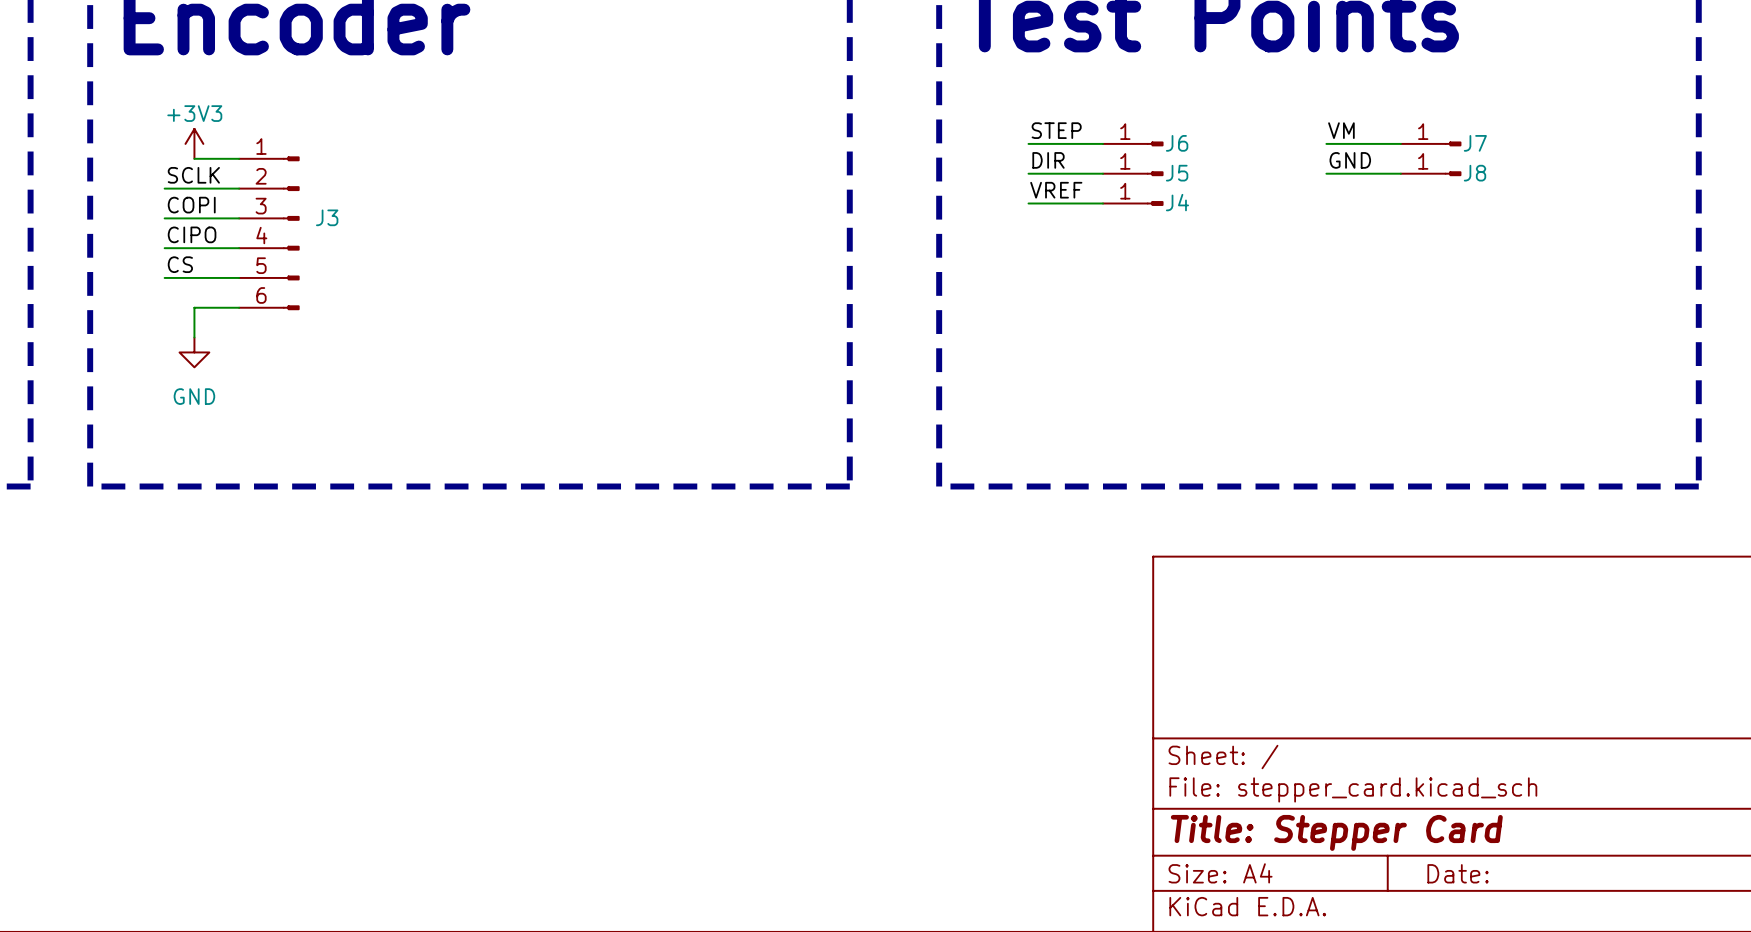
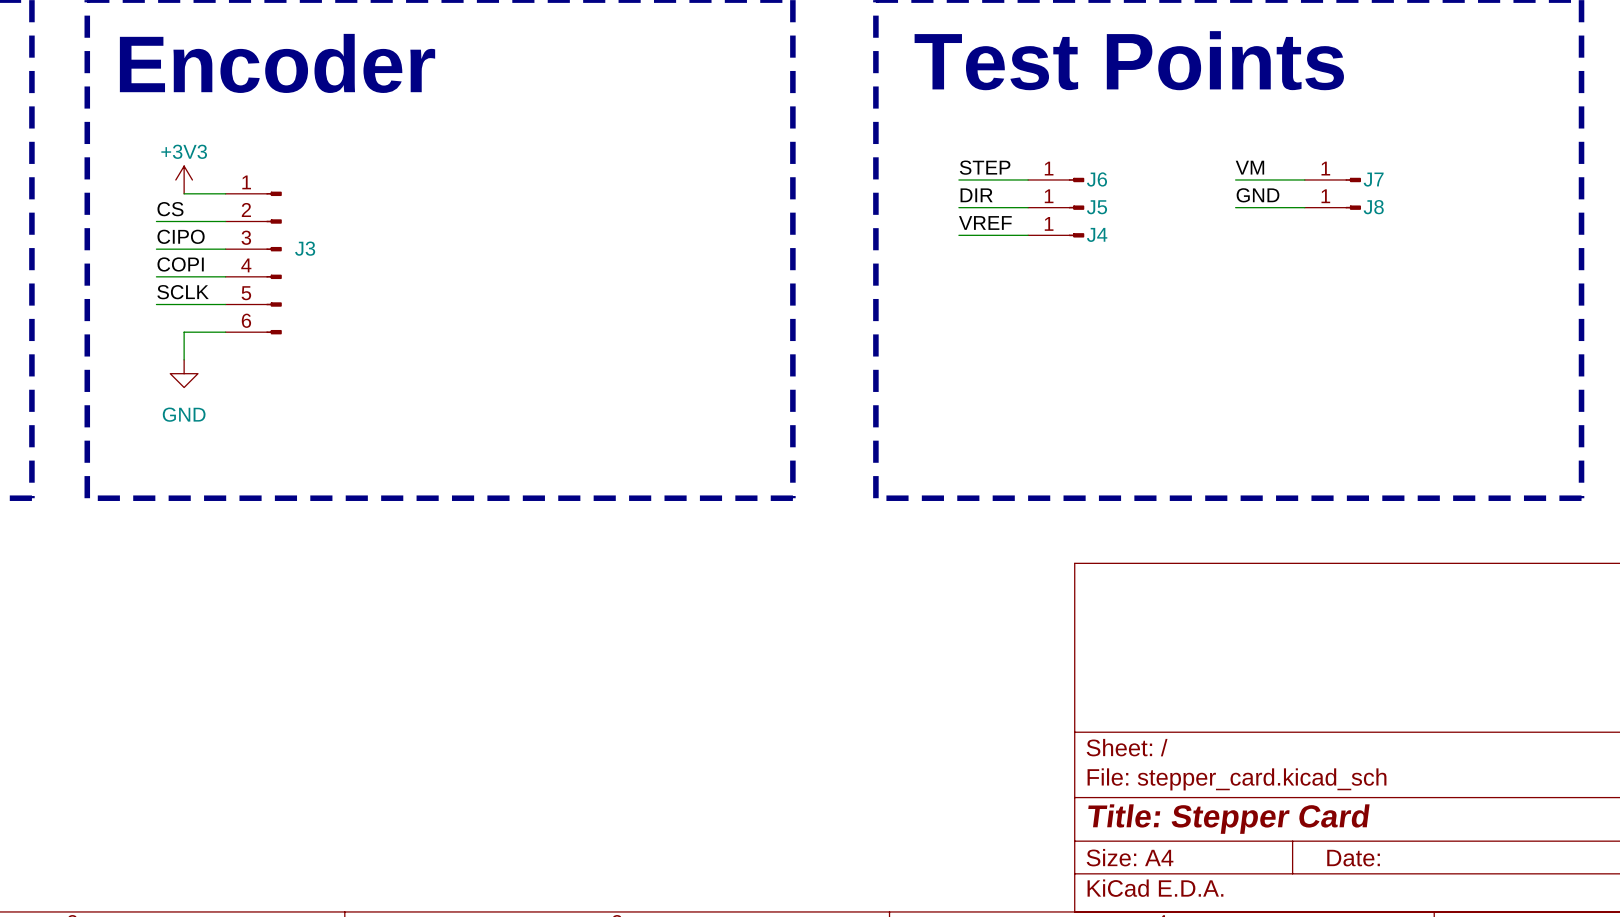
label: SCLK (193, 175) -> CS (170, 209)
label: COPI (191, 205) -> CIPO (181, 236)
label: CIPO (192, 234) -> COPI (180, 264)
label: CS (180, 264) -> SCLK (183, 292)

